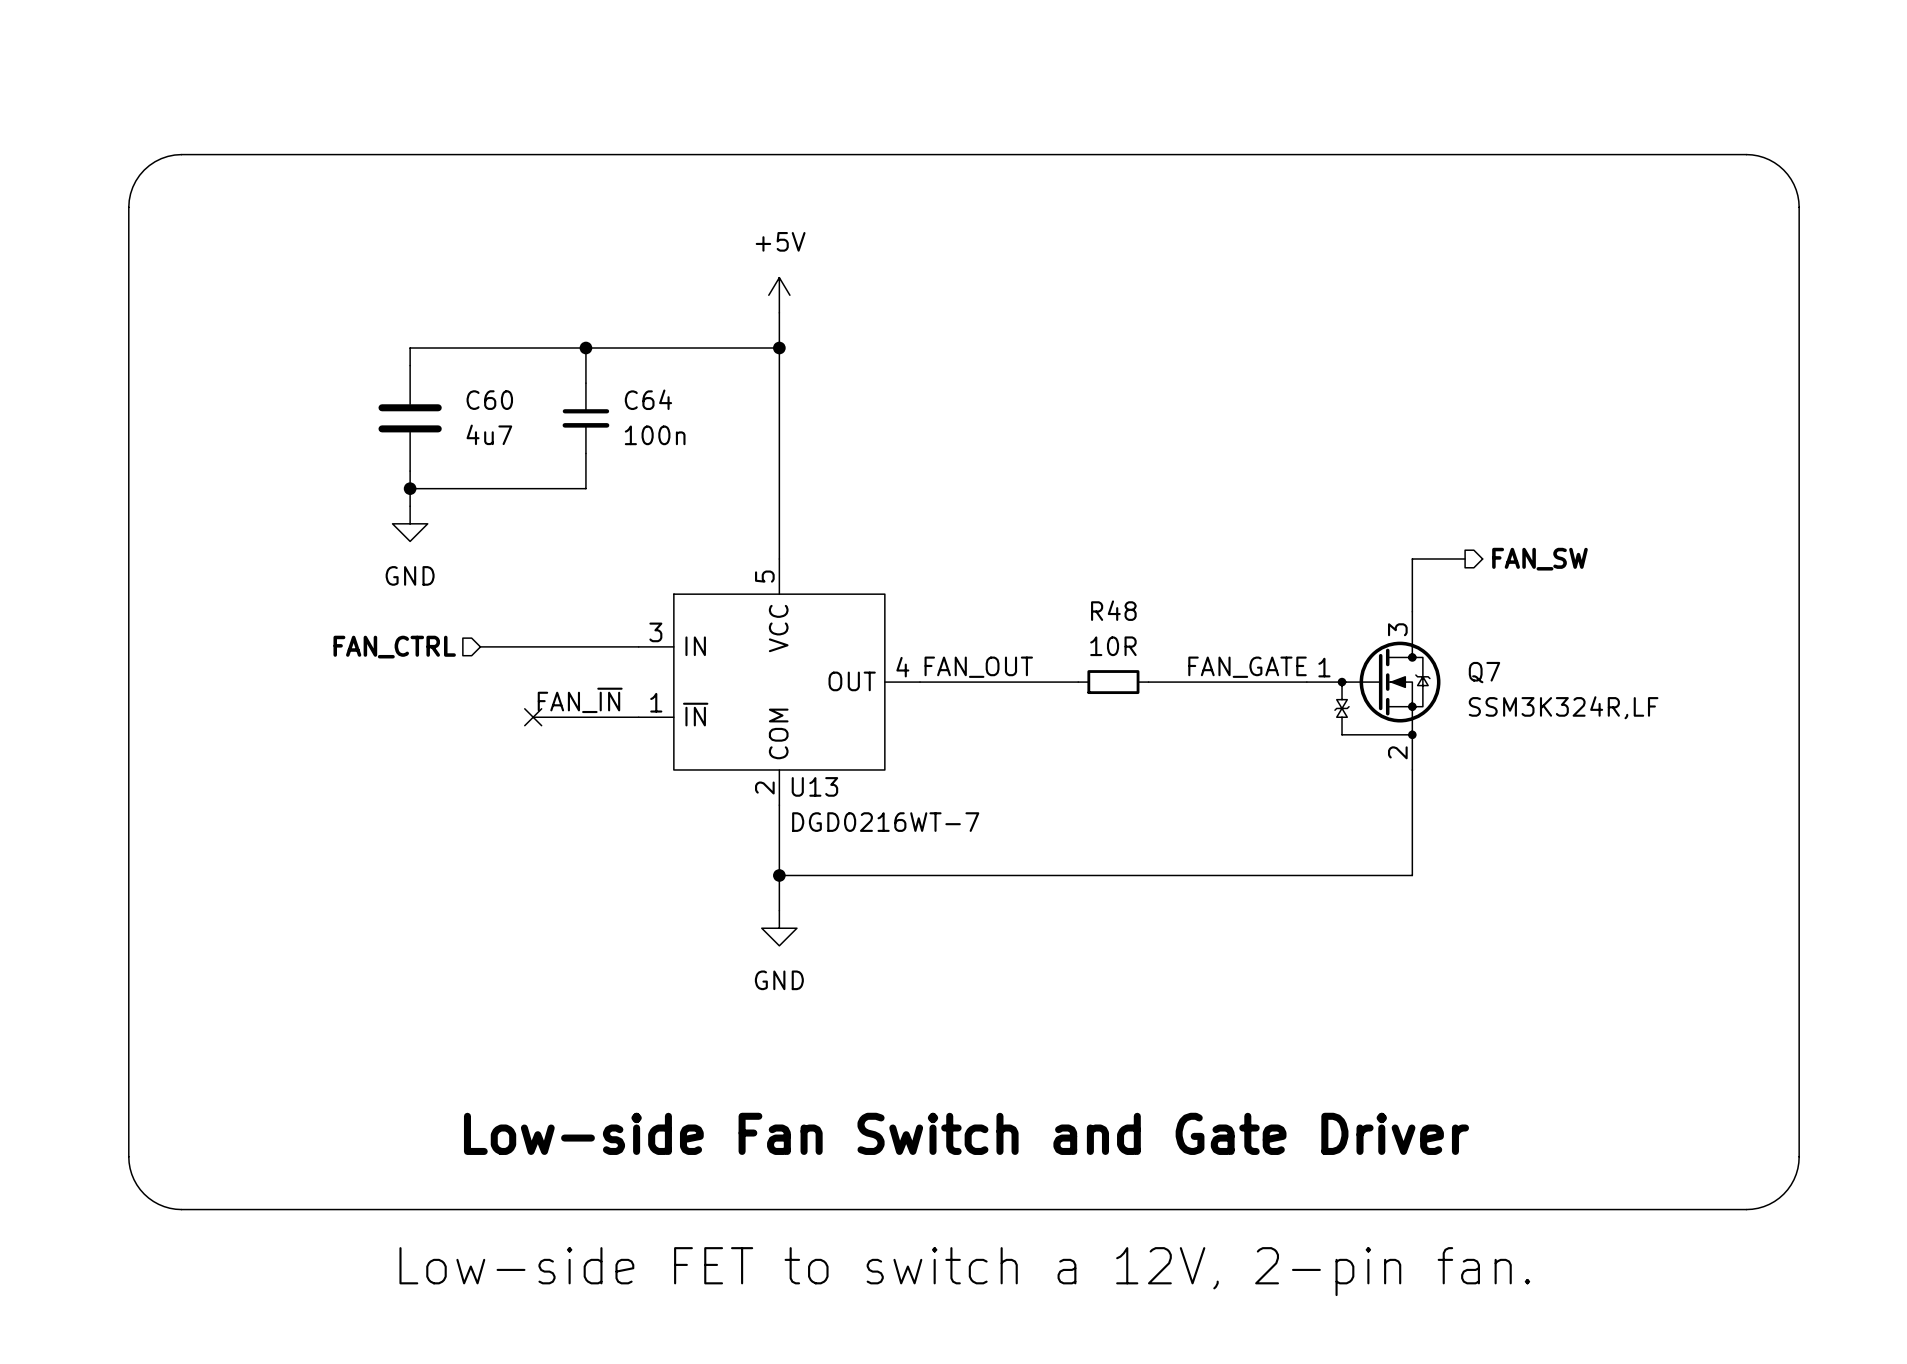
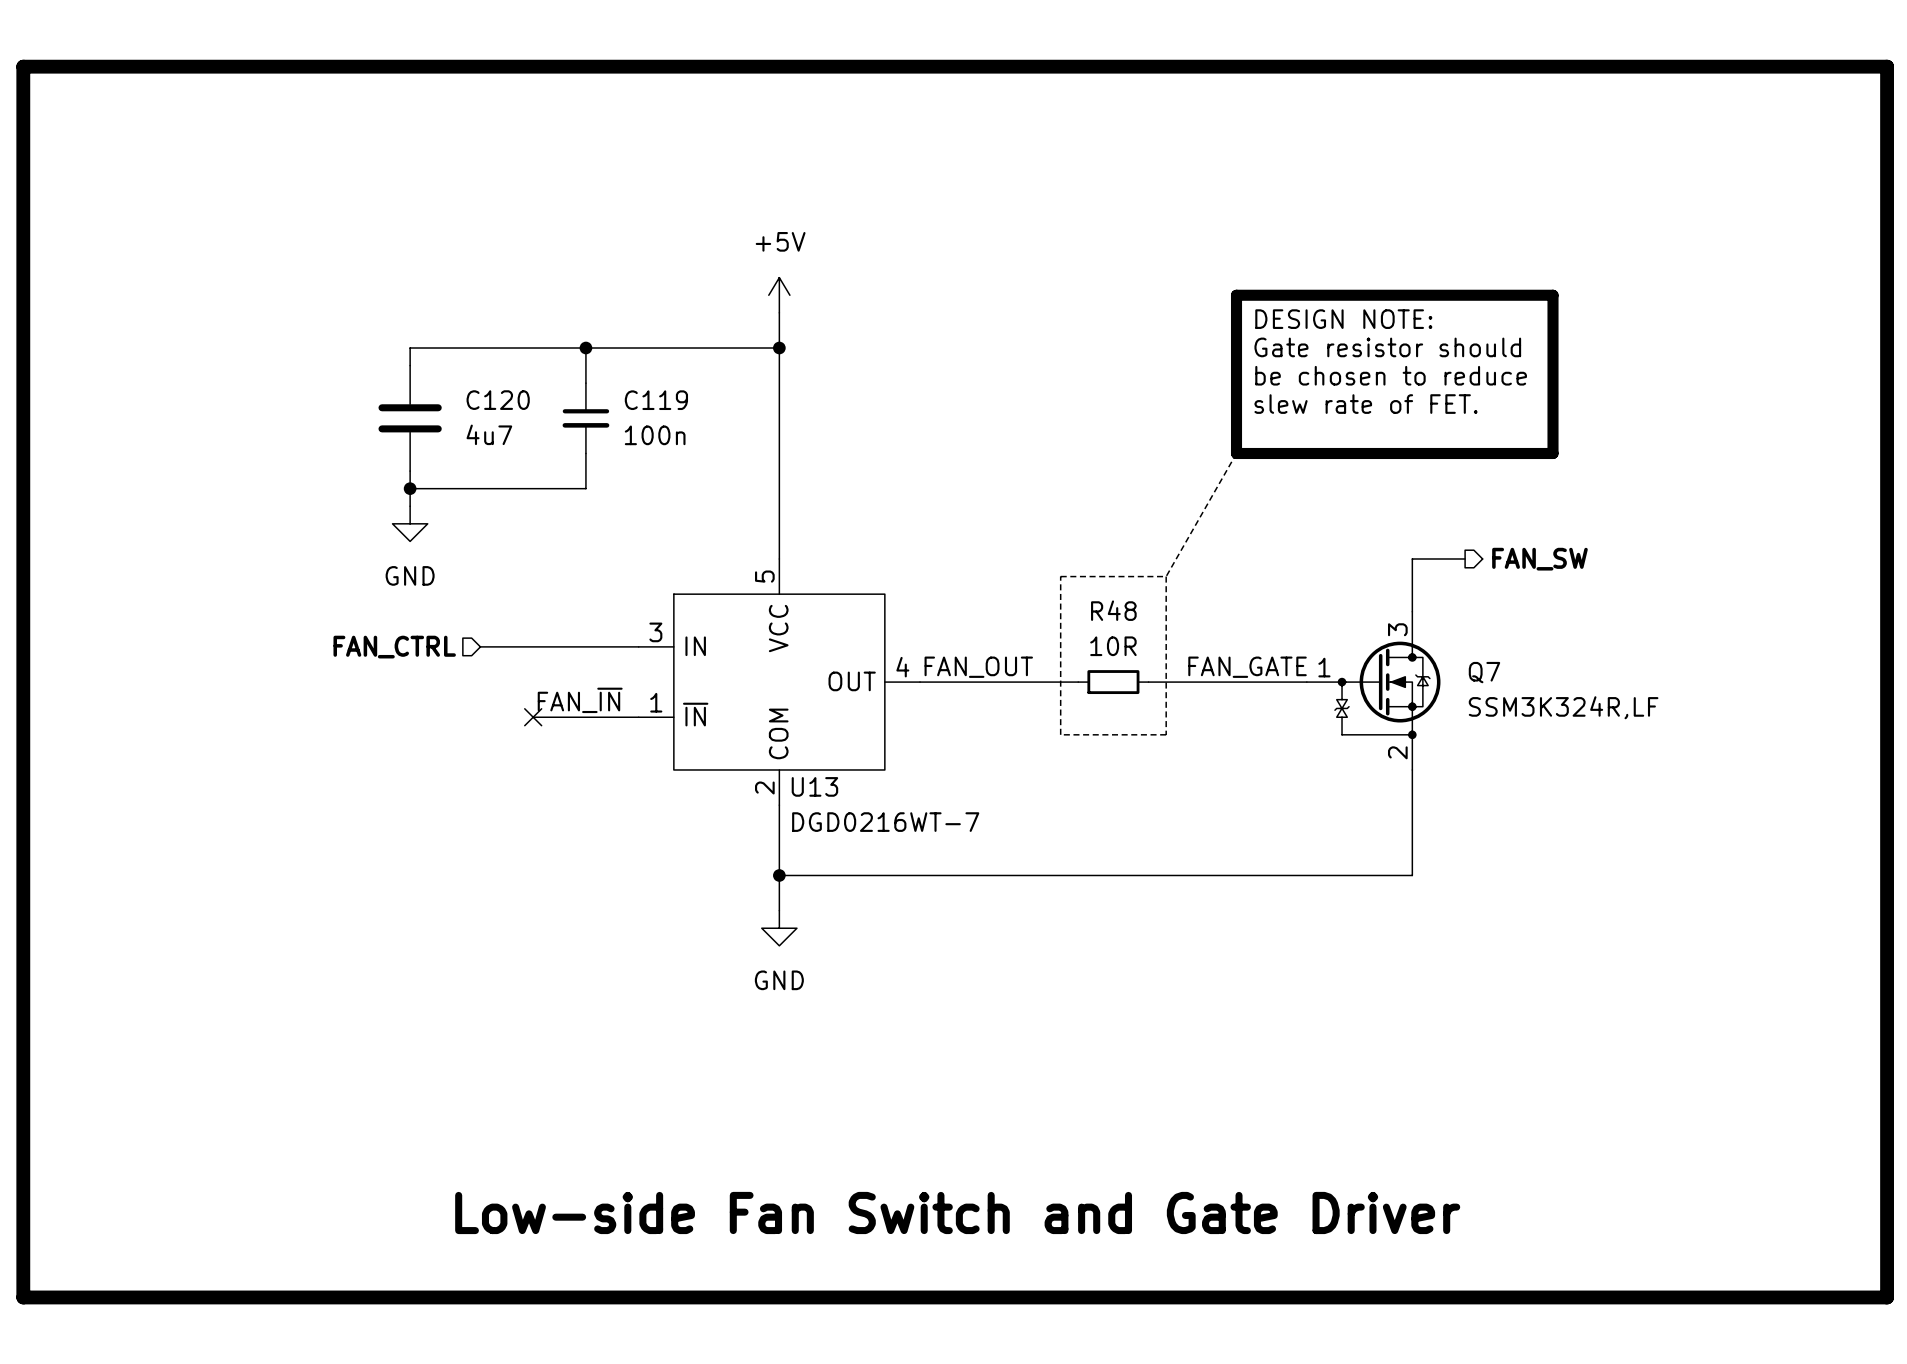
line: (181, 154) (1746, 154) (1758, 155) (1774, 162) (1783, 170) (1793, 184) (1799, 207) (1799, 1156) (1797, 1168) (1791, 1184) (1774, 1201) (1763, 1206) (1746, 1209) (181, 1209) (169, 1208) (153, 1201) (136, 1184) (131, 1174) (128, 1156) (128, 207) (132, 187) (144, 170) (161, 158) (181, 154) -> (23, 66) (23, 1297) (1887, 1297) (1887, 66) (23, 66)
text: none -> DESIGN NOTE: (1343, 319)
text: none -> Gate resistor should (1387, 347)
text: none -> be chosen to reduce (1391, 375)
C64 name: C64 (648, 399) -> C119 (656, 400)
C60 name: C60 (489, 400) -> C120 (498, 400)
text: none -> slew rate of FET. (1366, 404)
line: none -> (1236, 453) (1166, 576)
line: none -> (1236, 453) (1553, 453) (1553, 295) (1236, 295) (1236, 453)
line: none -> (1166, 576) (1060, 576) (1060, 734) (1166, 734) (1166, 576)
text position: Low-side Fan Switch and Gate Driver (966, 1133) -> Low-side Fan Switch and Gate Driver (957, 1212)
text: Low-side FET to switch a 12V, 2-pin fan. (964, 1271) -> none

